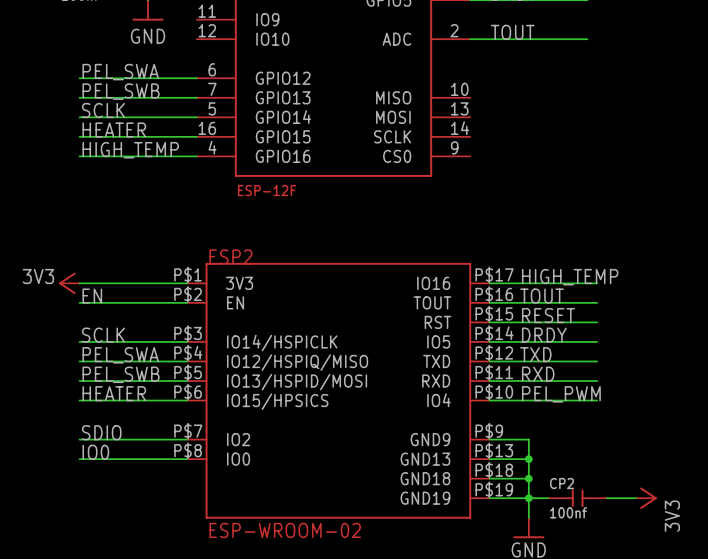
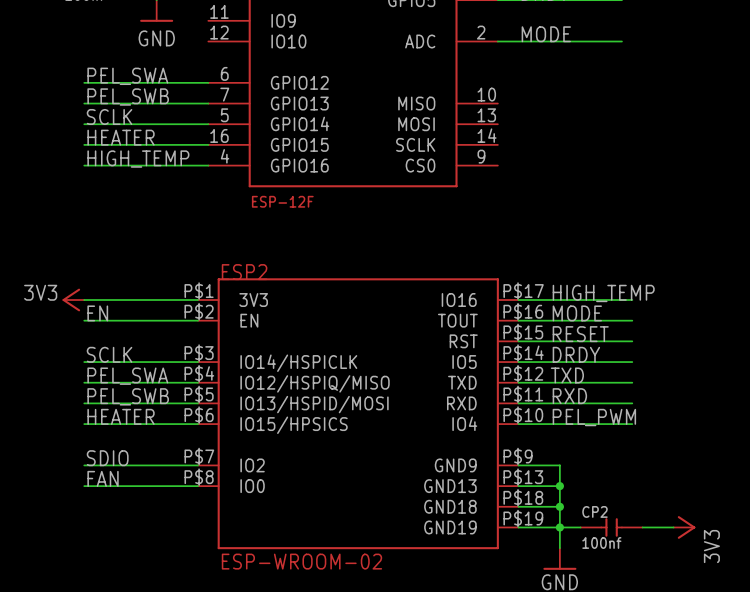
label: TOUT (512, 32) -> MODE (546, 34)
label: TOUT (542, 296) -> MODE (577, 313)
label: IO0 (95, 452) -> FAN (103, 478)

